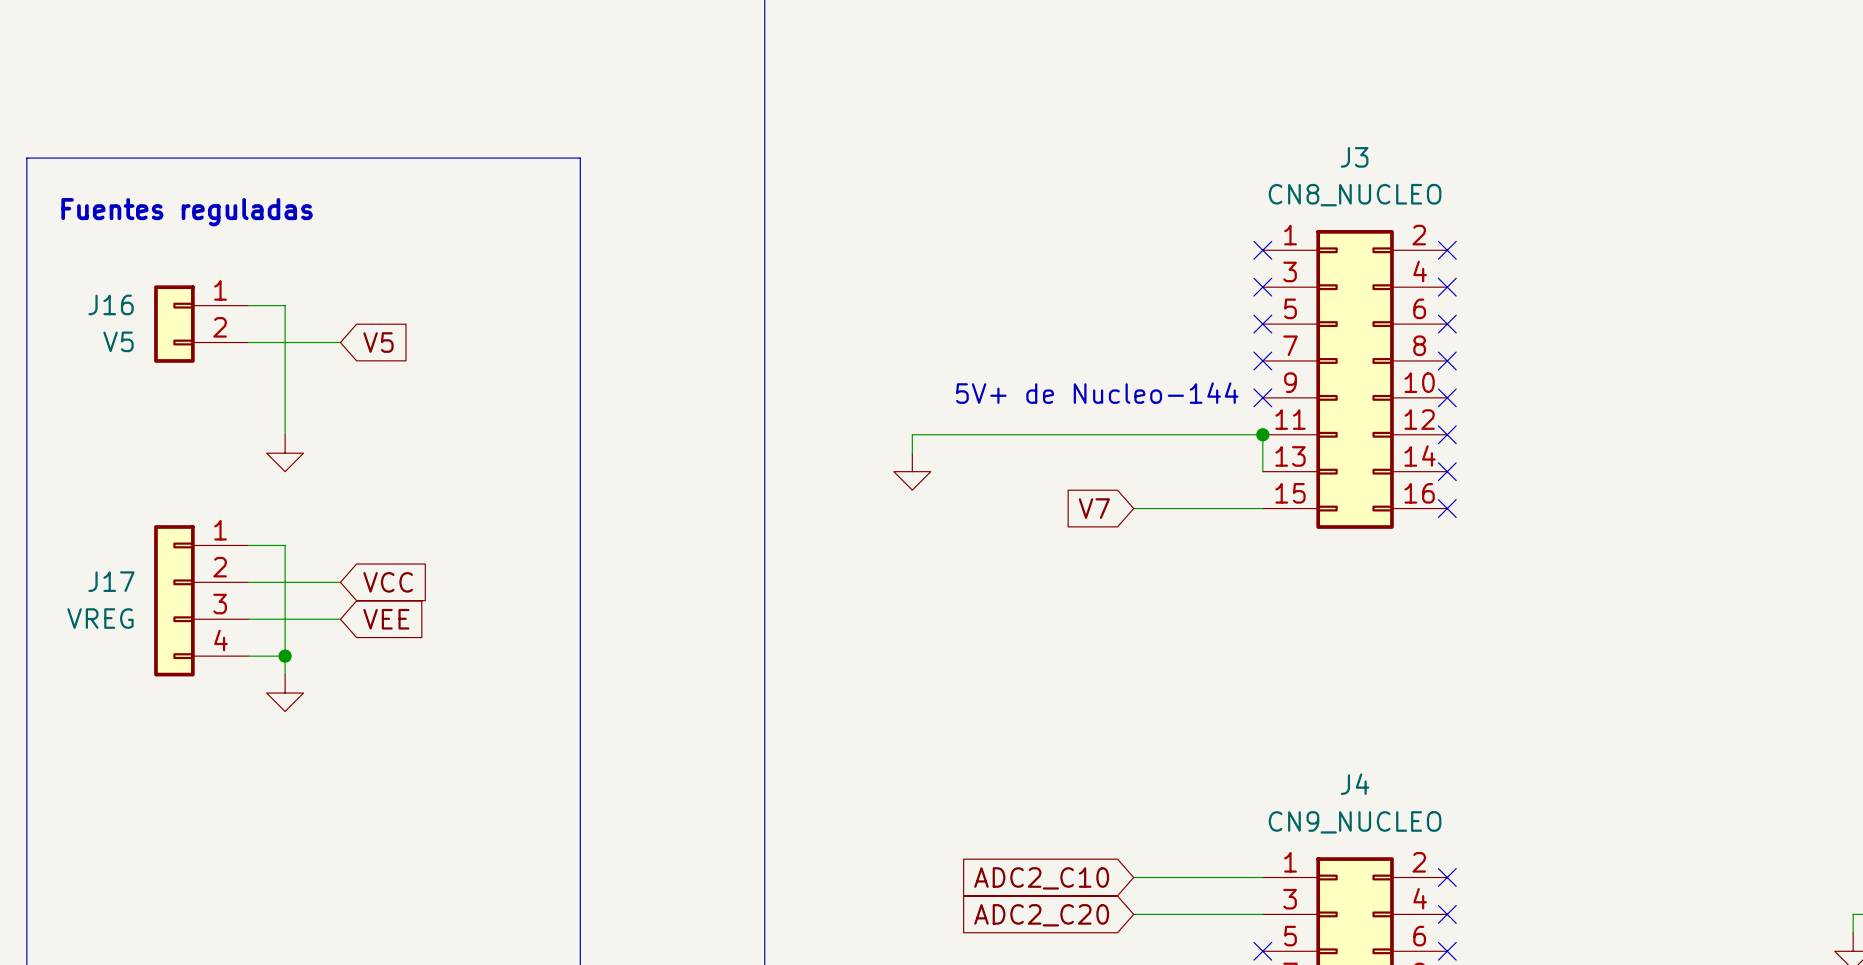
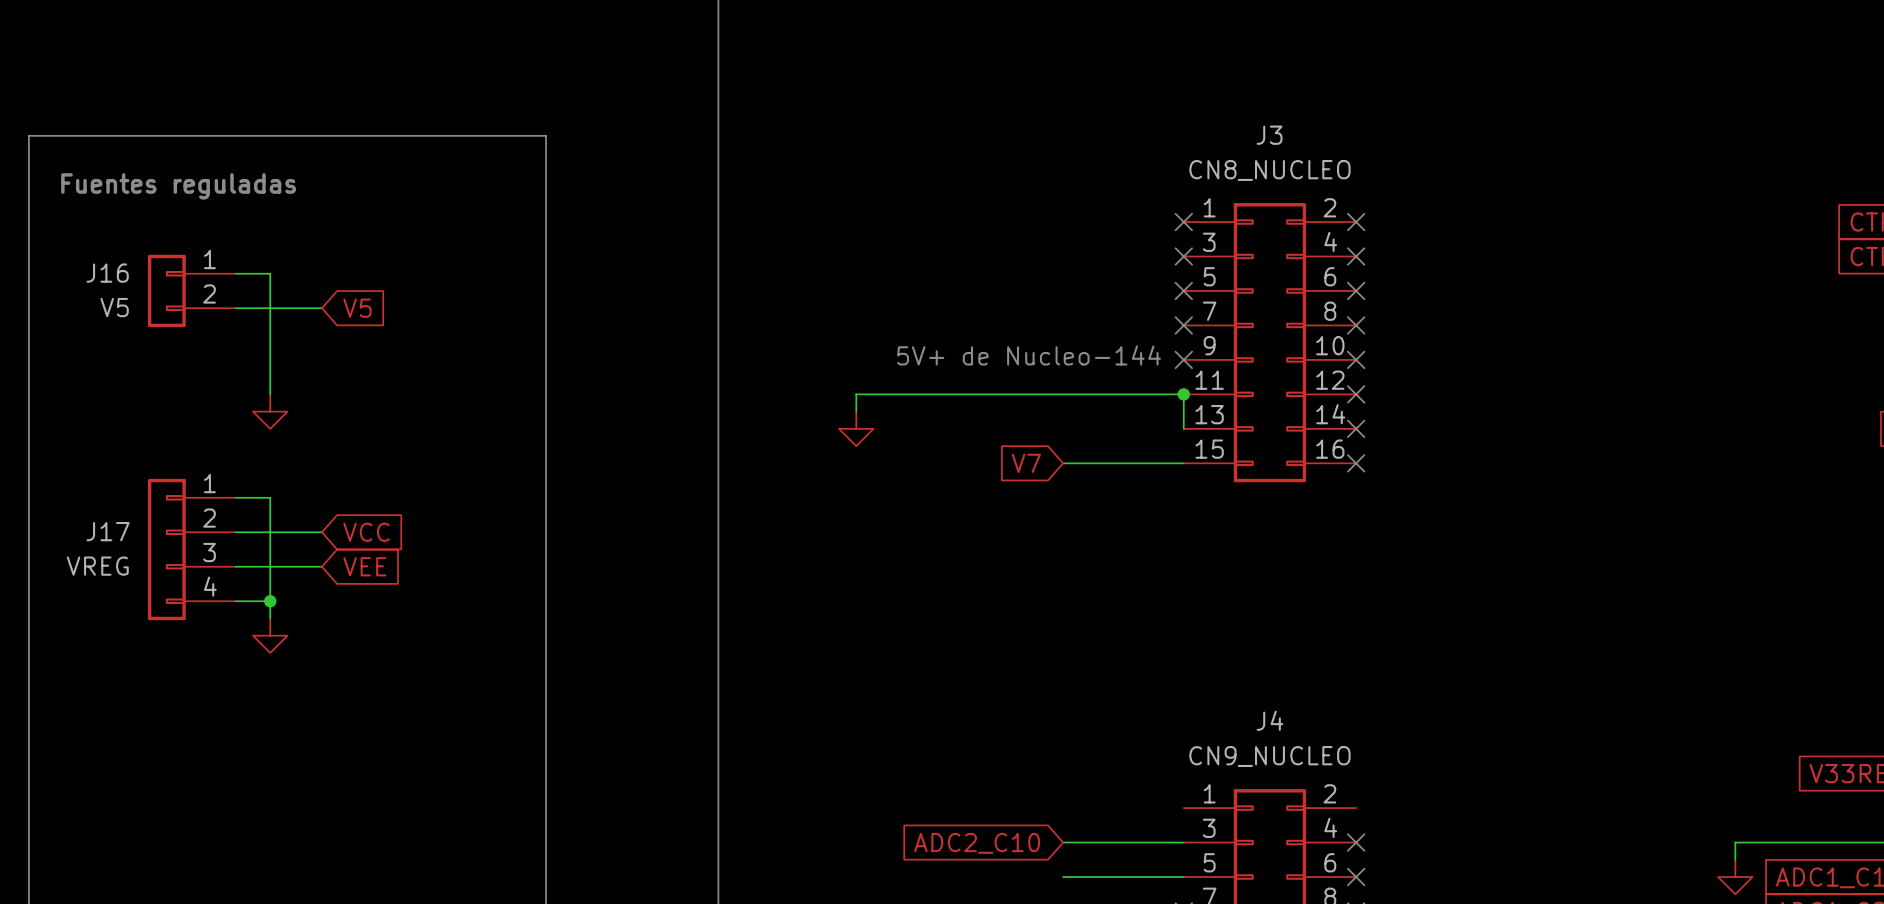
wire: (1133, 877) (1262, 877) -> (1063, 877) (1183, 877)
no-connect mark: (1447, 877) -> none
global label: ADC2_C10 (1041, 878) -> none
global label: ADC2_C20 (1041, 915) -> ADC2_C10 (977, 843)
no-connect mark: (1262, 951) -> none

